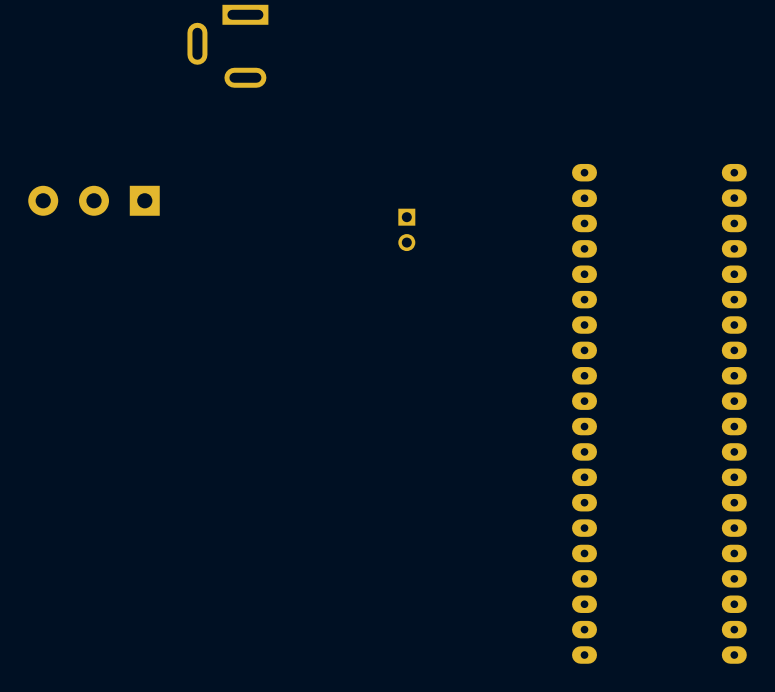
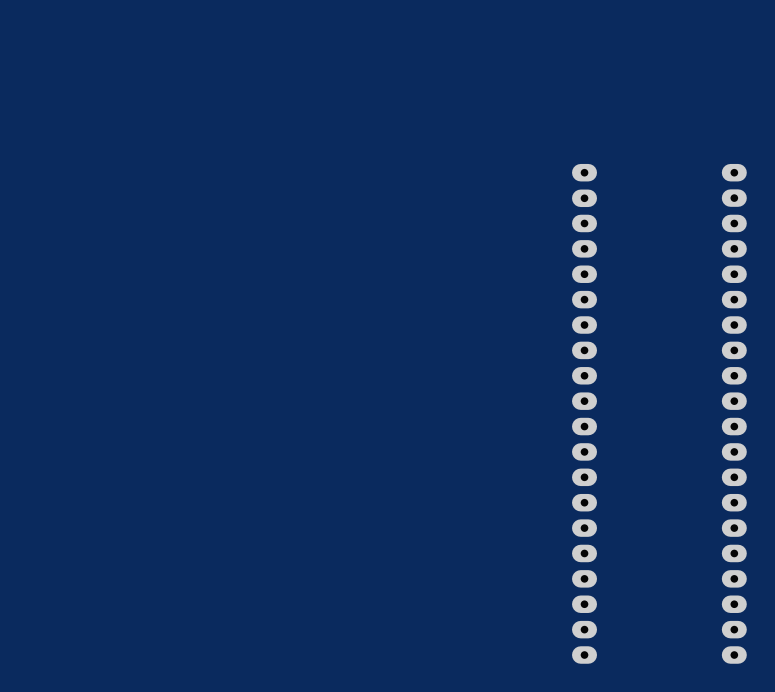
part: (227, 46) -> none
part: (94, 200) -> none
part: (406, 229) -> none

